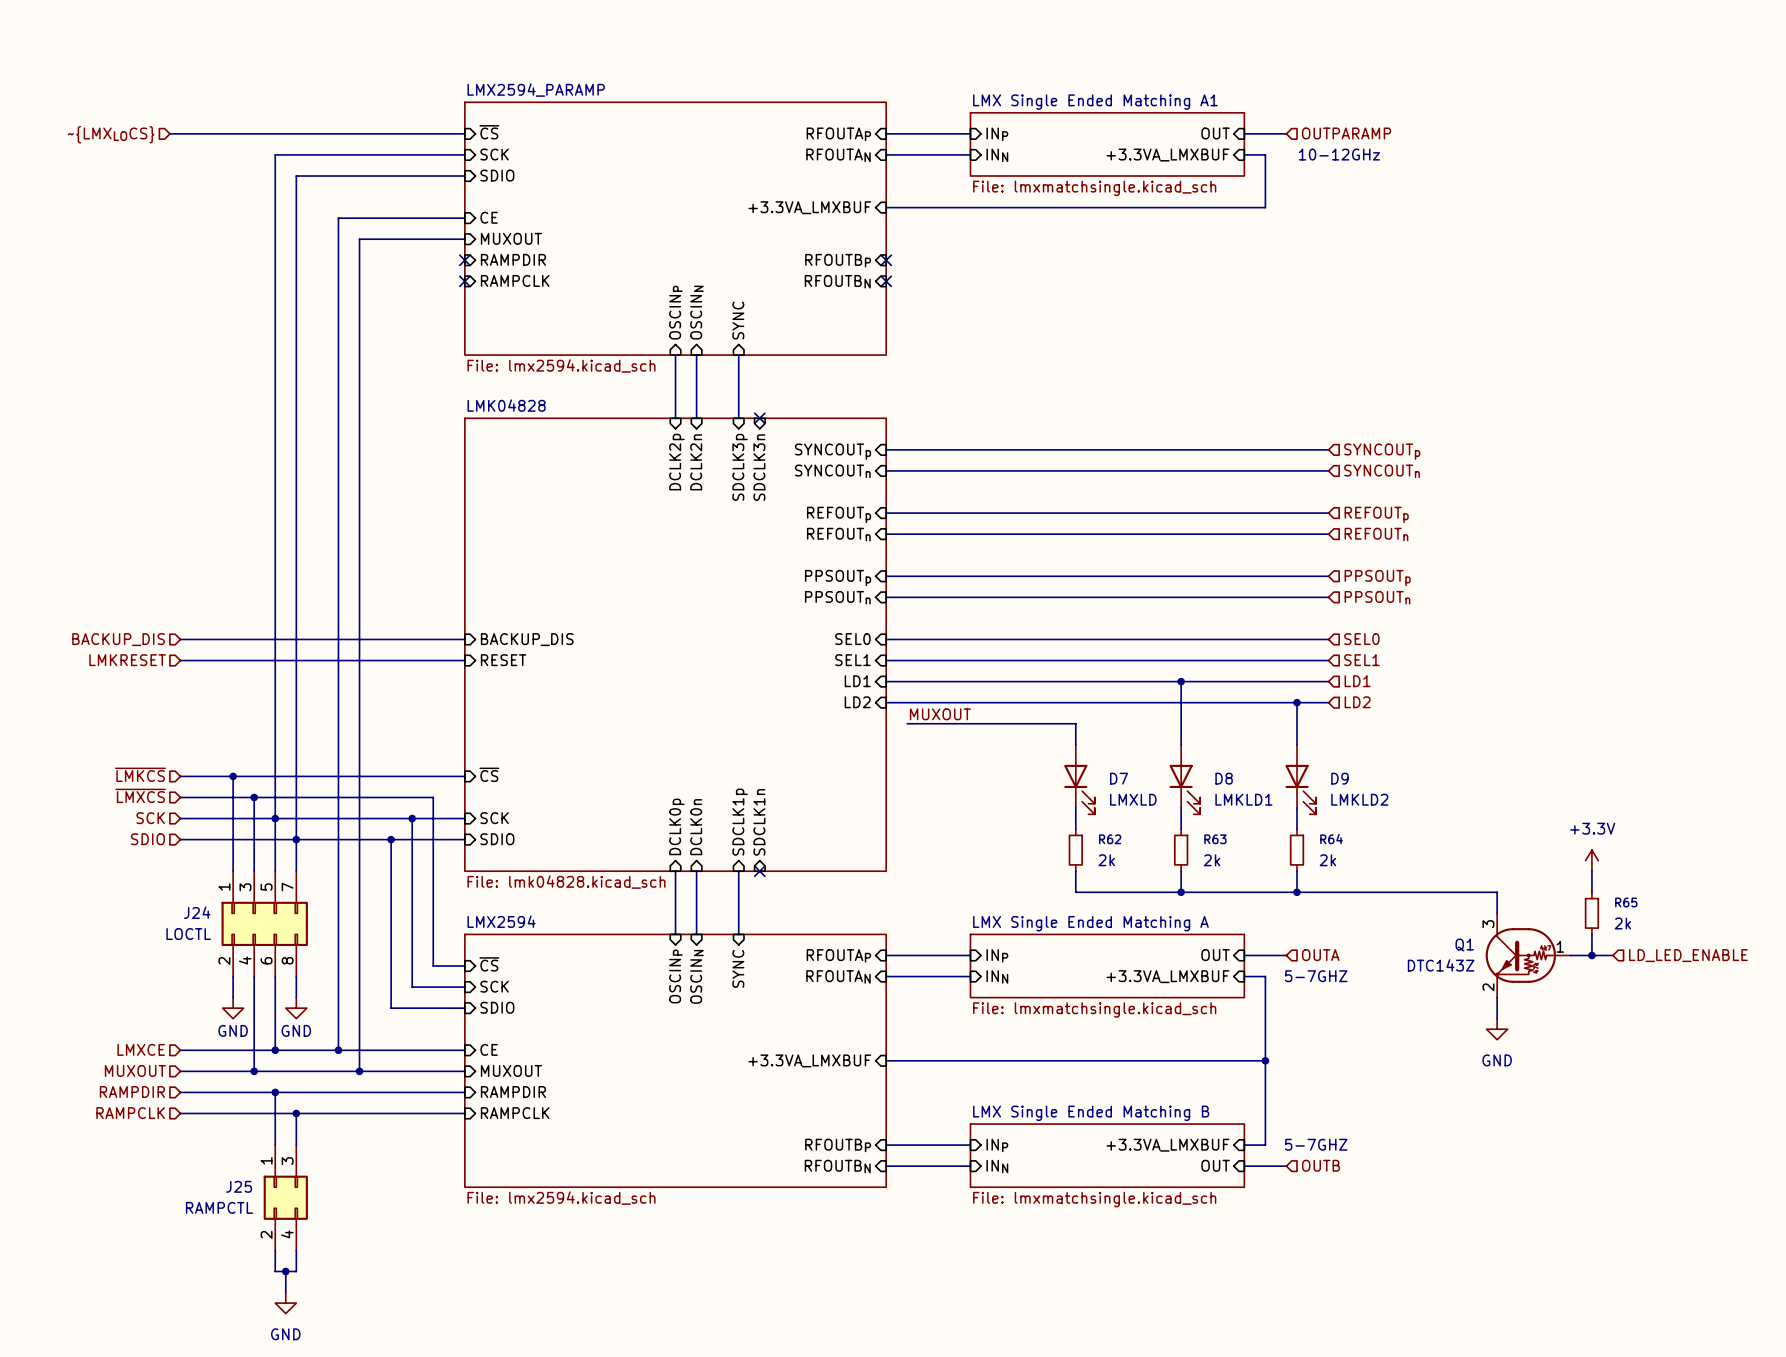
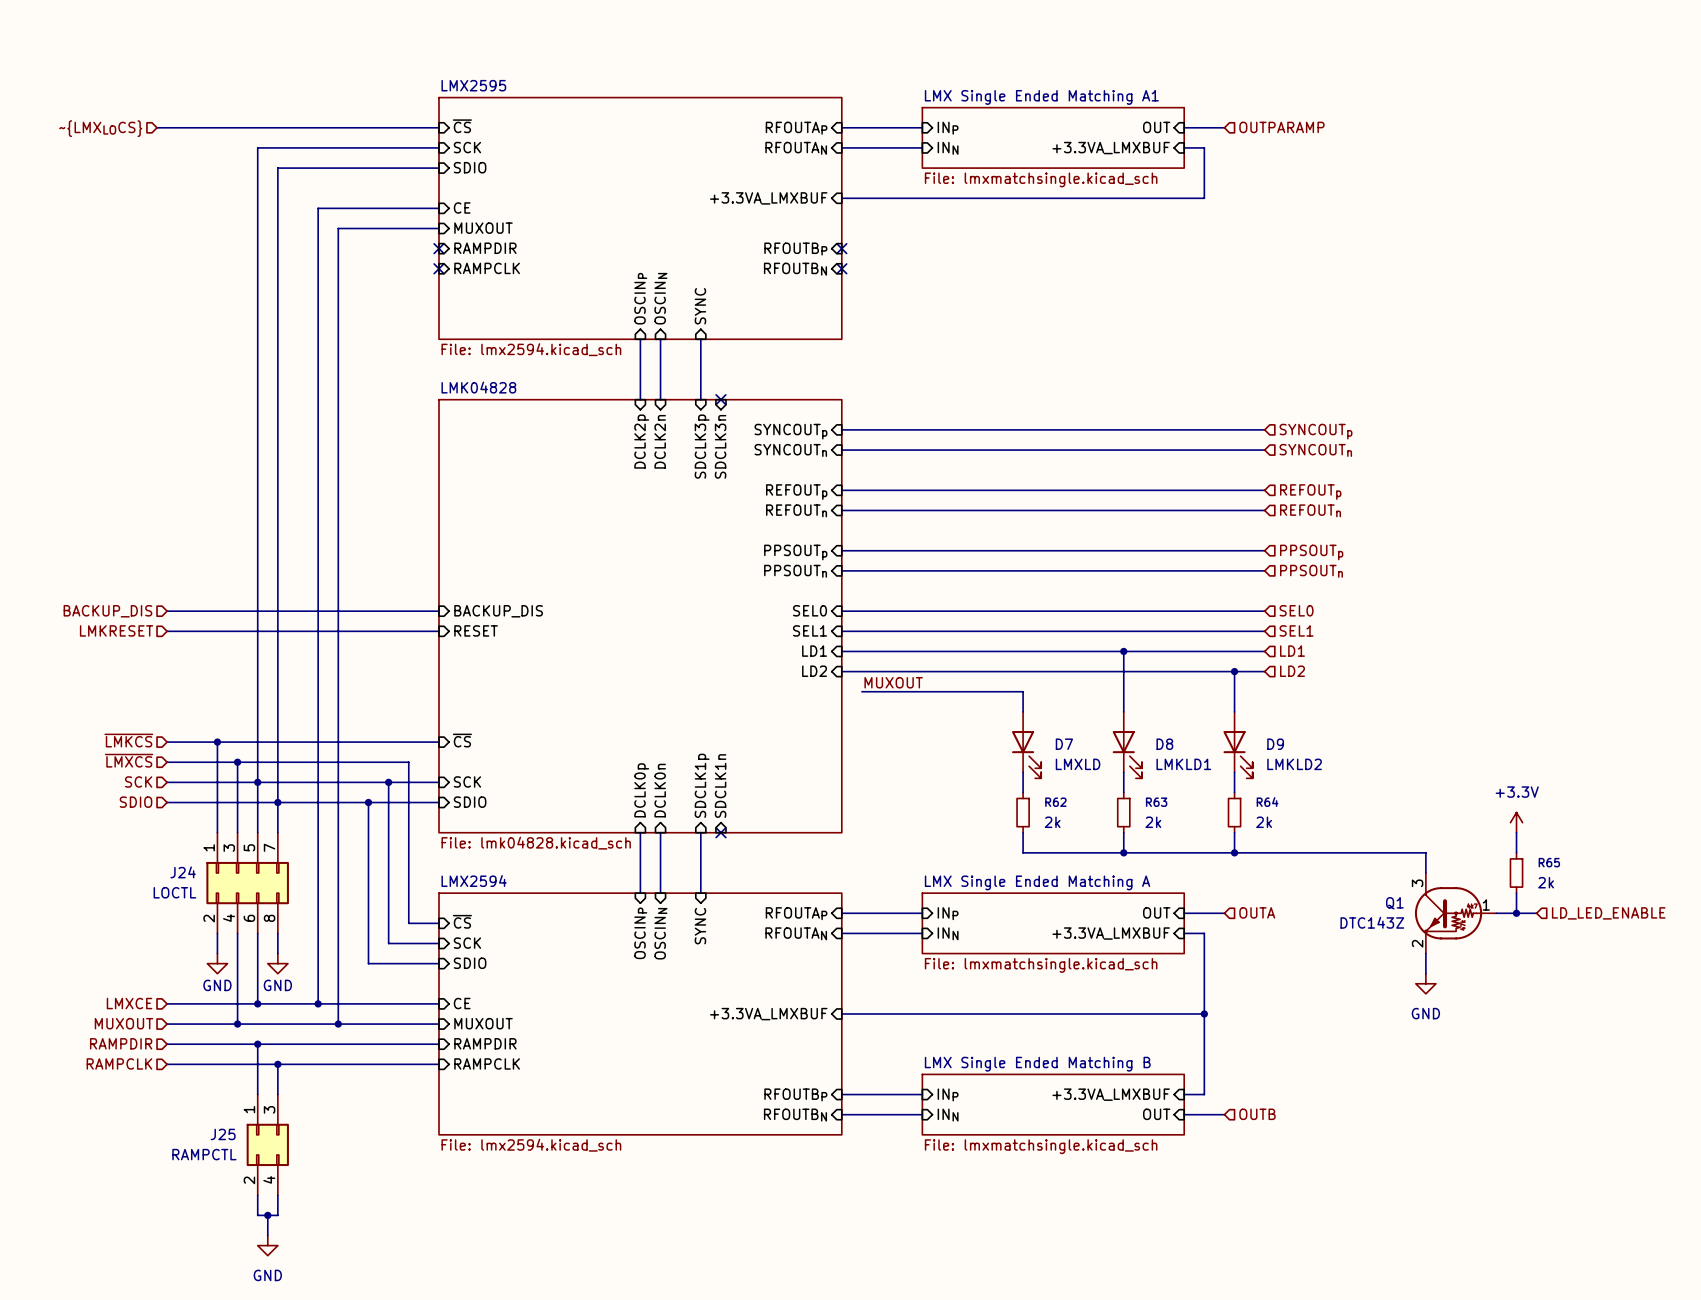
sheet LMX2594_PARAMP name: LMX2594_PARAMP (536, 90) -> LMX2595 (473, 85)
text: 10-12GHz (1339, 154) -> none
text: 5-7GHZ (1316, 976) -> none
text: 5-7GHZ (1316, 1144) -> none

